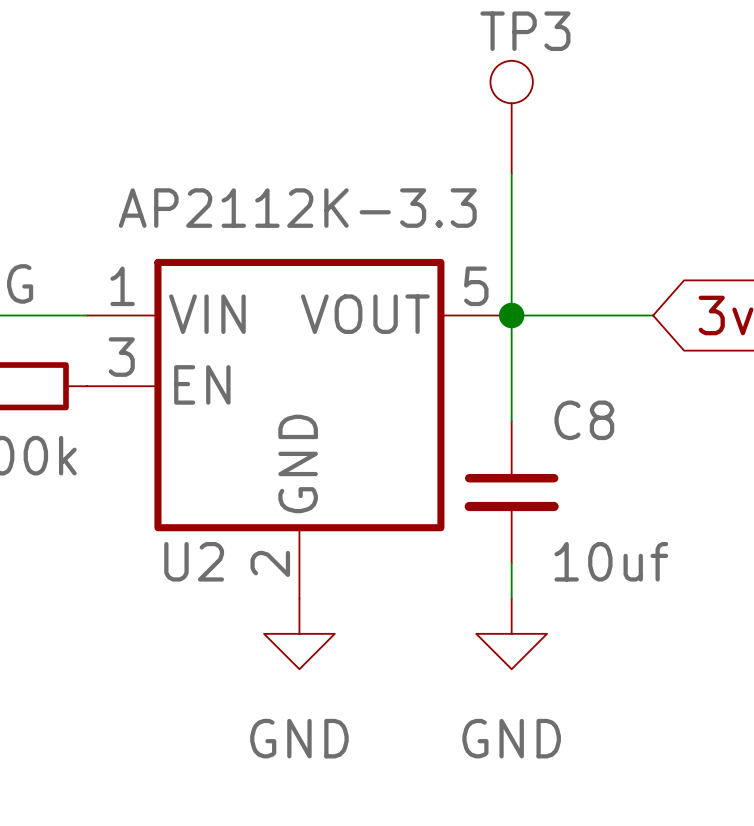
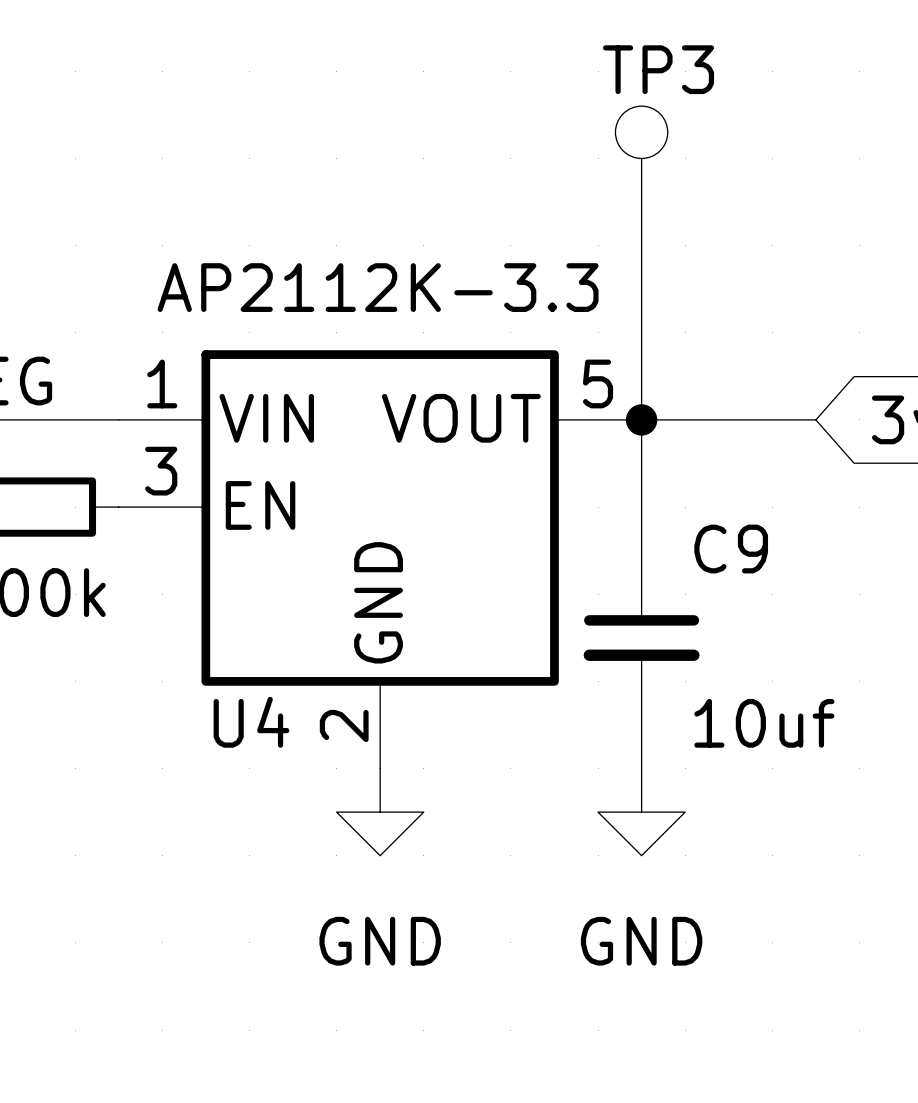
C8 name: C8 (584, 420) -> C9 (731, 549)
U2 name: U2 (194, 561) -> U4 (251, 722)

